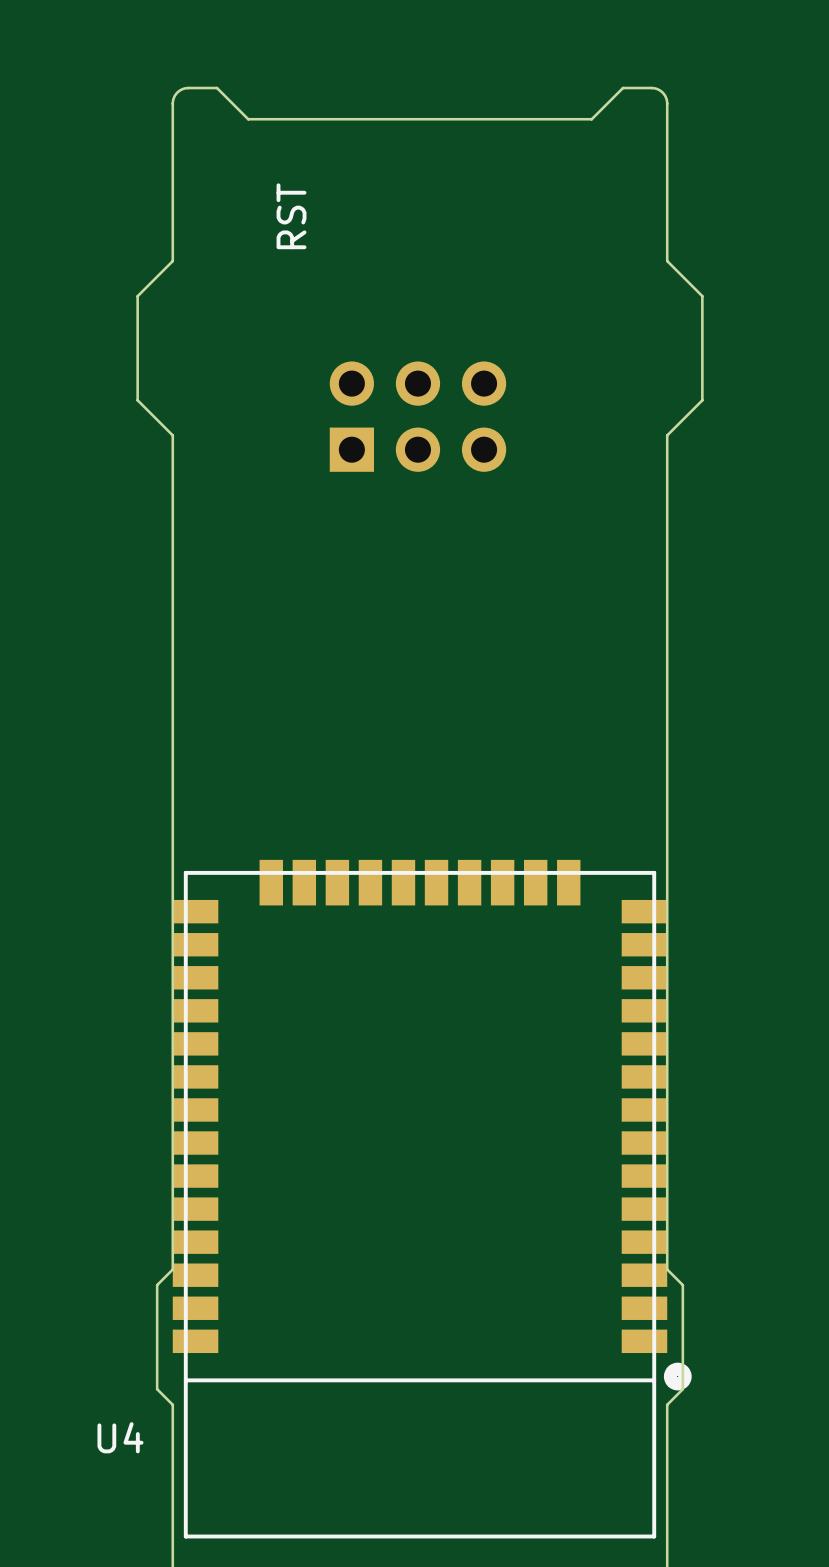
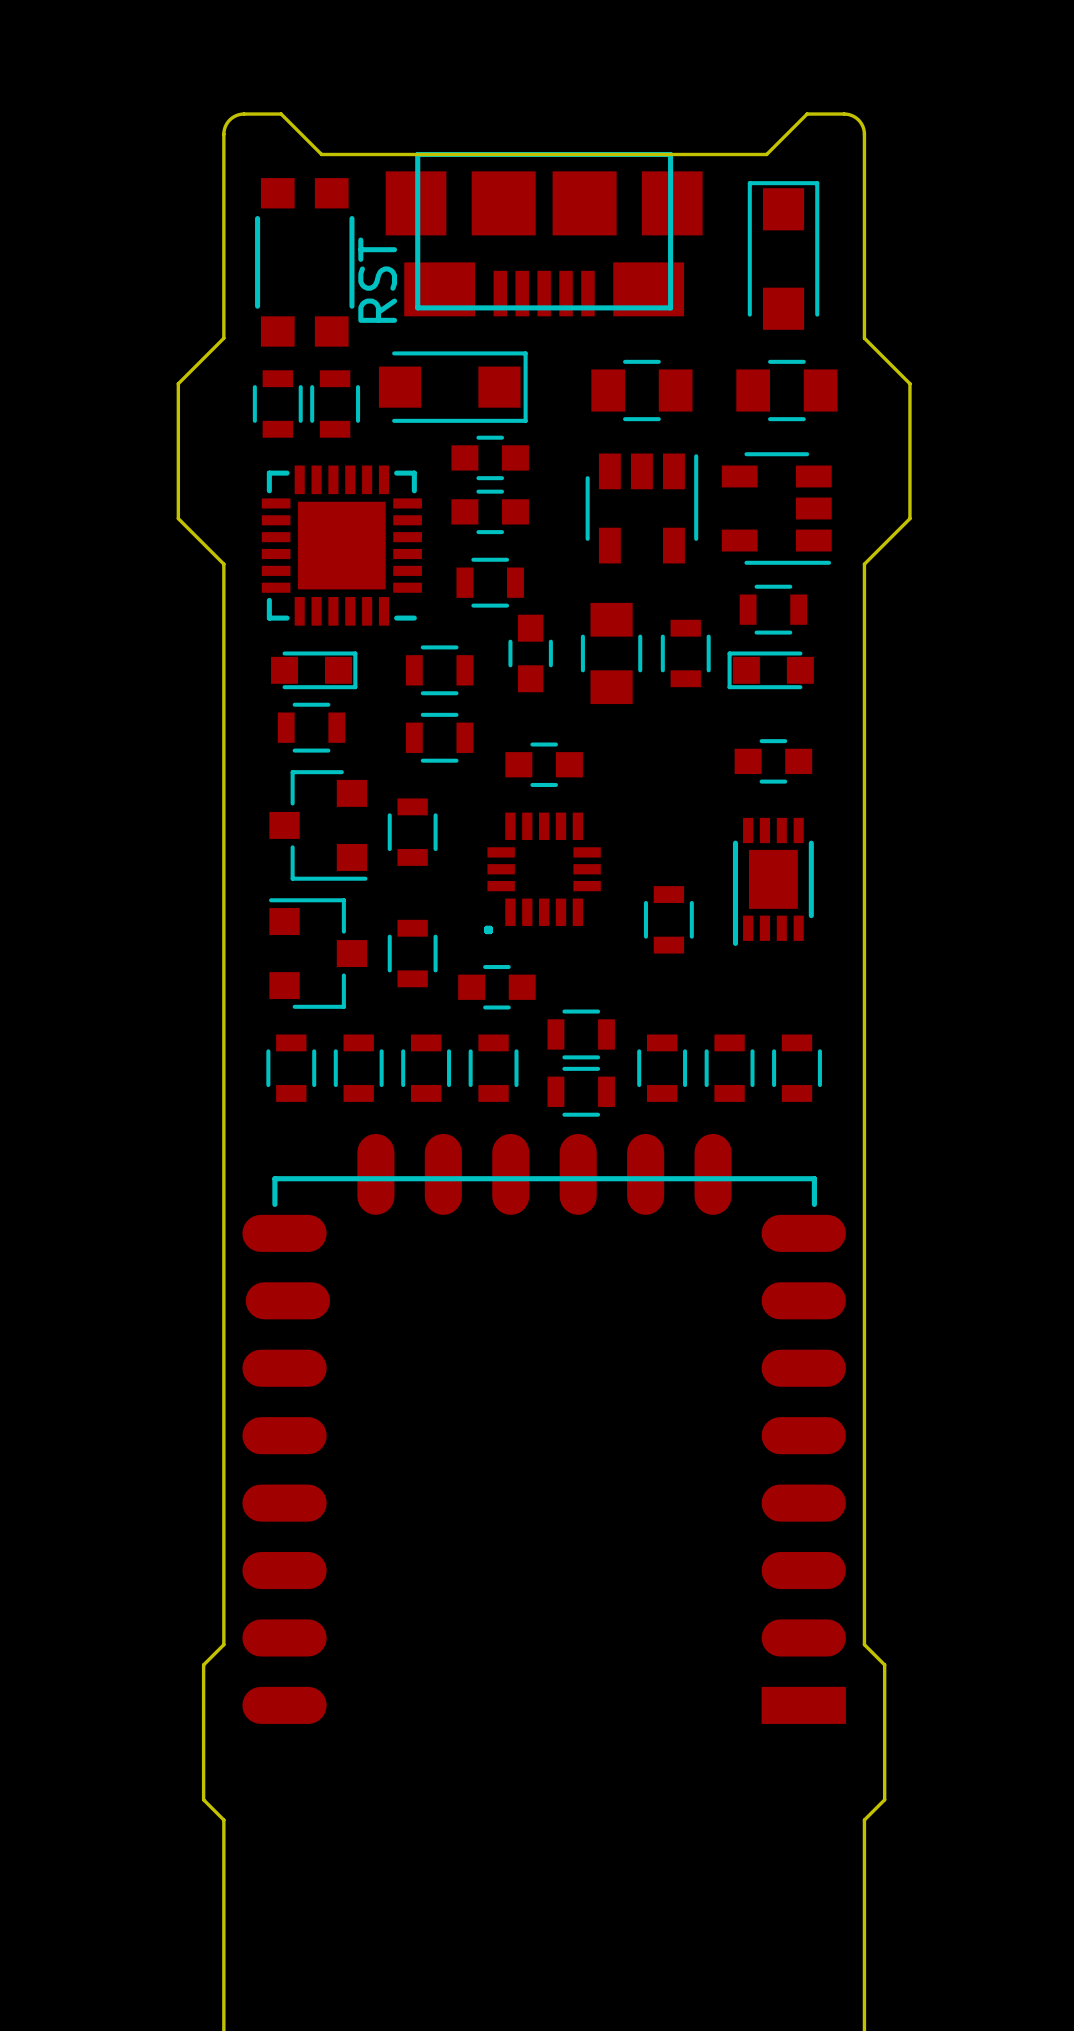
part: none -> (544, 234)
part: none -> (783, 255)
part: none -> (304, 262)
part: none -> (453, 387)
part: none -> (641, 390)
part: none -> (786, 390)
part: none -> (277, 403)
part: none -> (335, 403)
part: none -> (490, 457)
part: none -> (641, 508)
part: none -> (776, 508)
part: none -> (490, 511)
part: (417, 416) -> none
part: none -> (341, 545)
part: none -> (490, 582)
part: none -> (773, 609)
part: none -> (530, 653)
part: none -> (611, 653)
part: none -> (685, 653)
part: none -> (314, 670)
part: none -> (439, 670)
part: none -> (770, 670)
part: none -> (311, 727)
part: none -> (439, 737)
part: none -> (773, 761)
part: none -> (544, 764)
part: none -> (318, 825)
part: none -> (412, 832)
part: none -> (542, 873)
part: none -> (773, 881)
part: none -> (668, 919)
part: none -> (318, 953)
part: none -> (412, 953)
part: none -> (496, 987)
part: none -> (581, 1034)
part: none -> (291, 1068)
part: none -> (358, 1068)
part: none -> (426, 1068)
part: none -> (493, 1068)
part: none -> (662, 1068)
part: none -> (729, 1068)
part: none -> (797, 1068)
part: none -> (581, 1091)
part: none -> (544, 1428)
U4: (432, 1199) -> none

